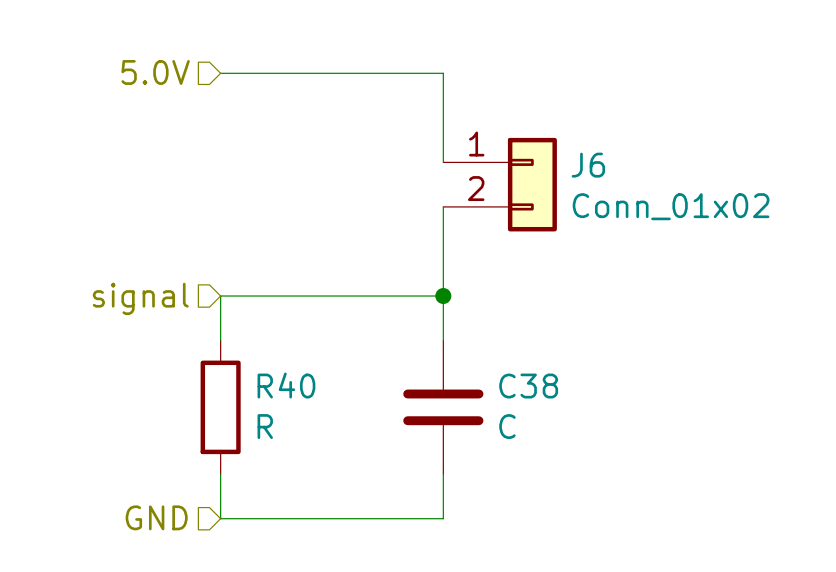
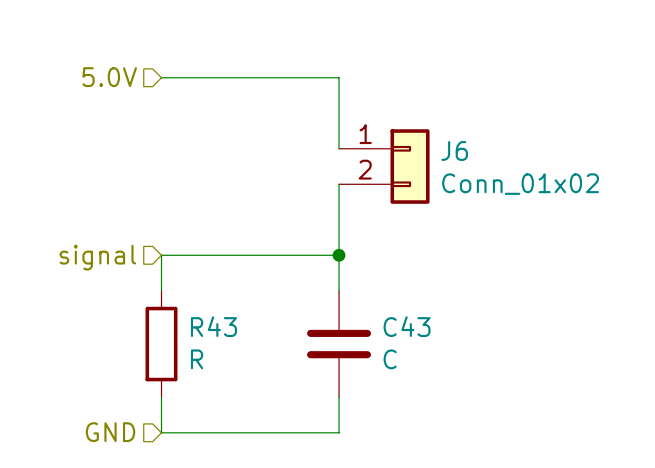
R40 name: R40 (286, 385) -> R43 (213, 326)
C38 name: C38 (528, 386) -> C43 (407, 326)

